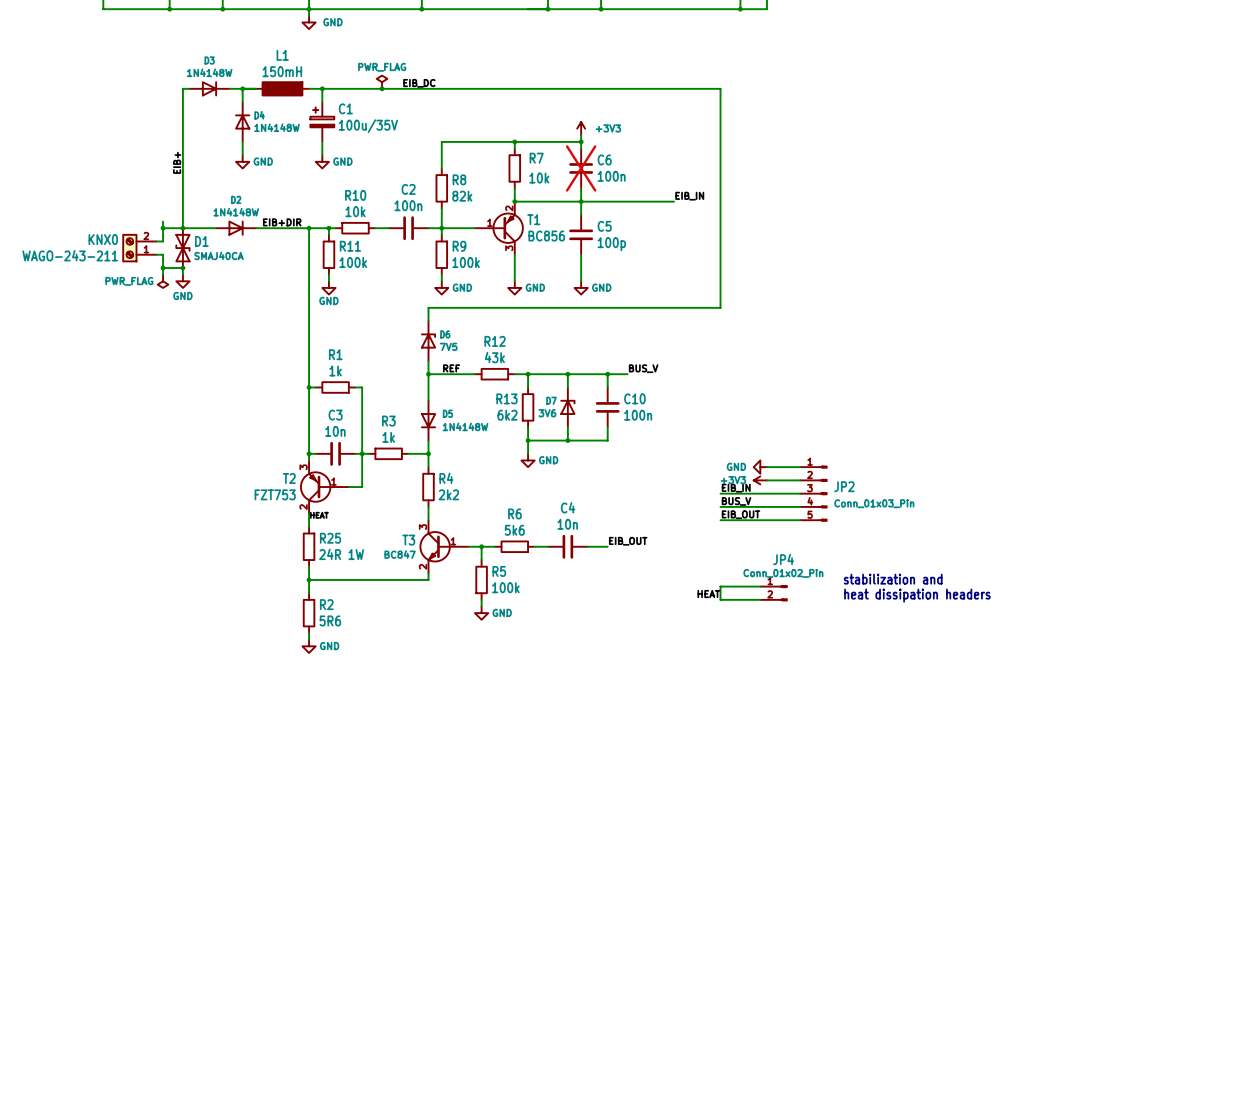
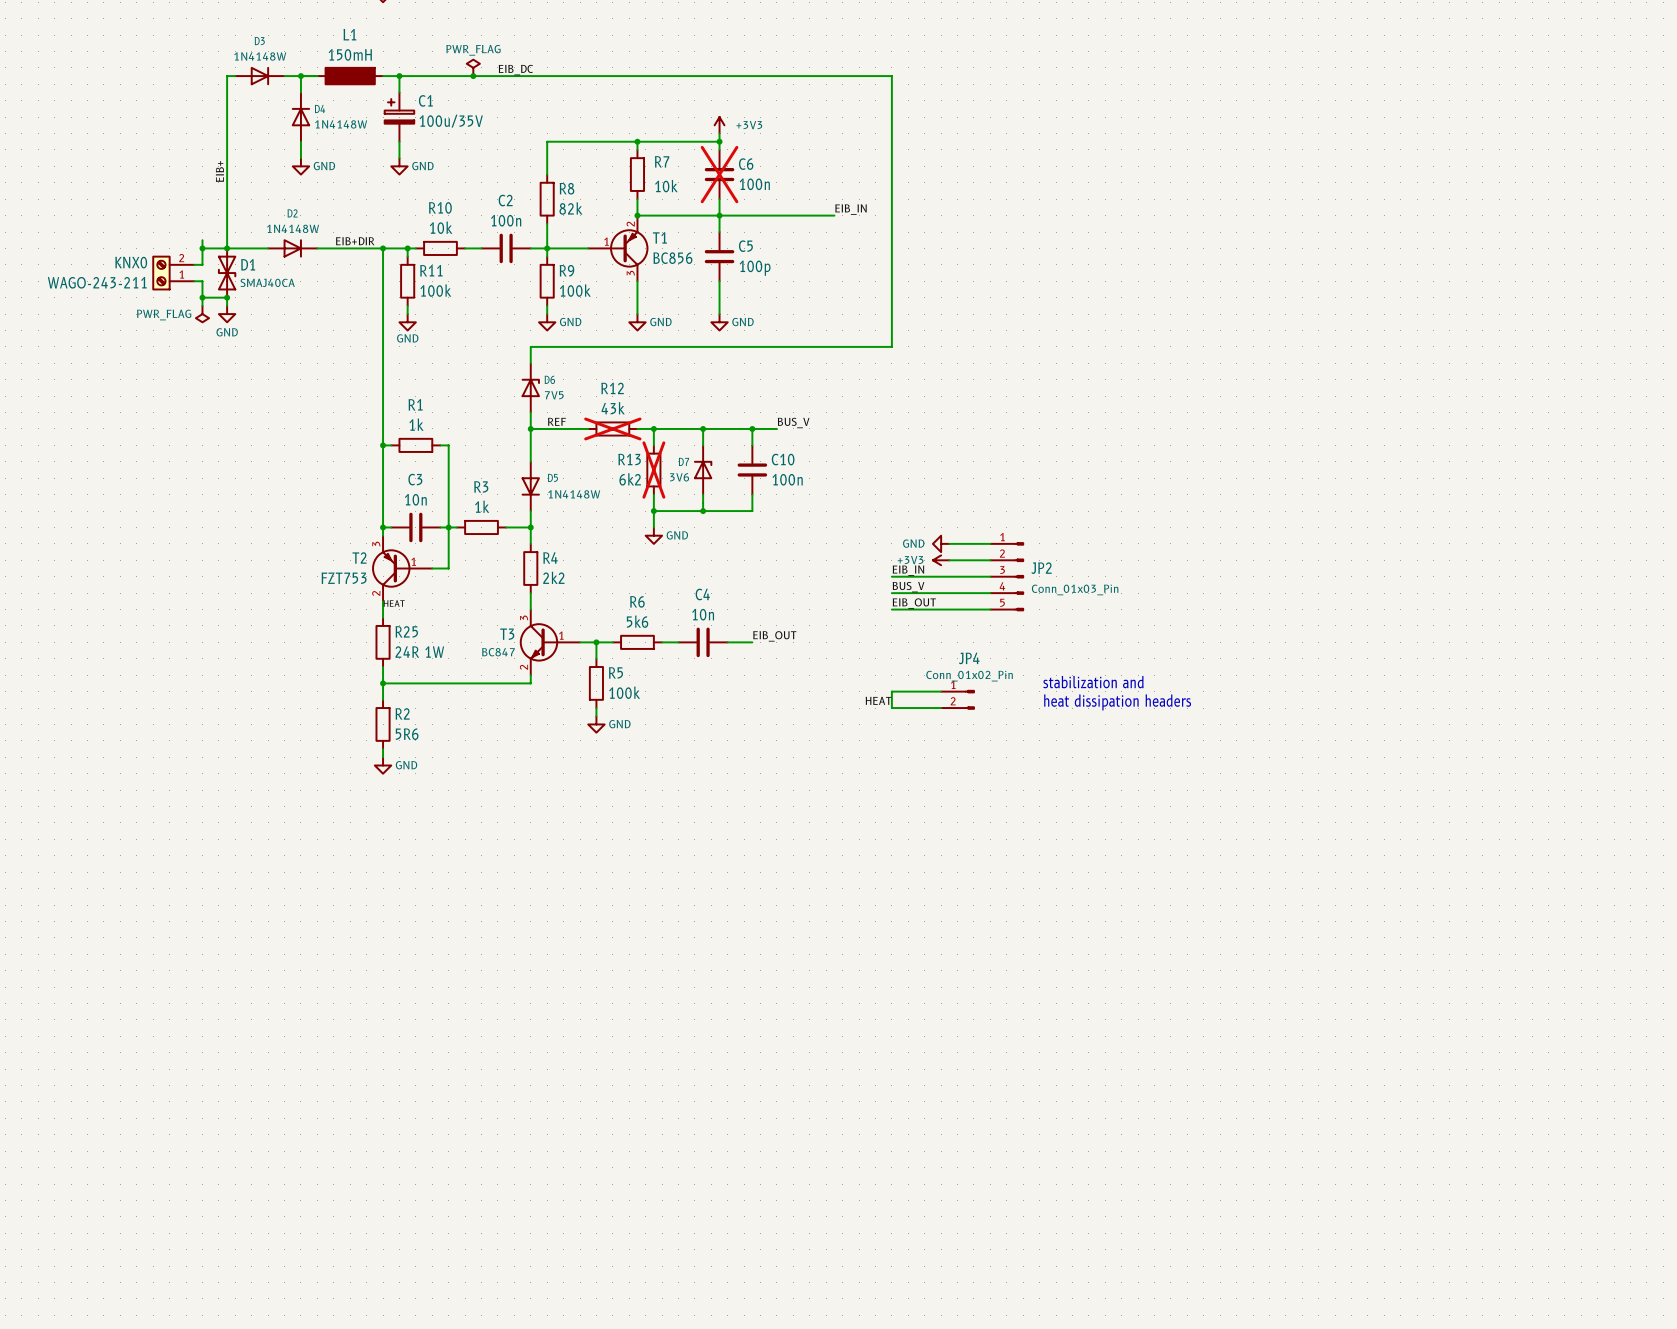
R12 do-not-place cross: none -> (612, 428)
R13 do-not-place cross: none -> (653, 470)

